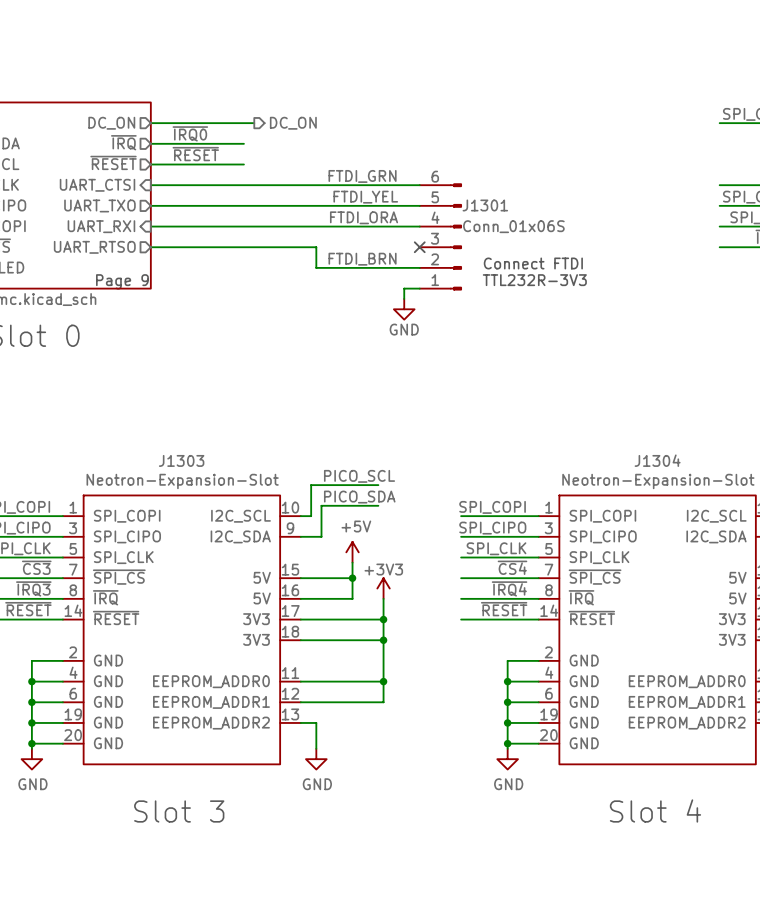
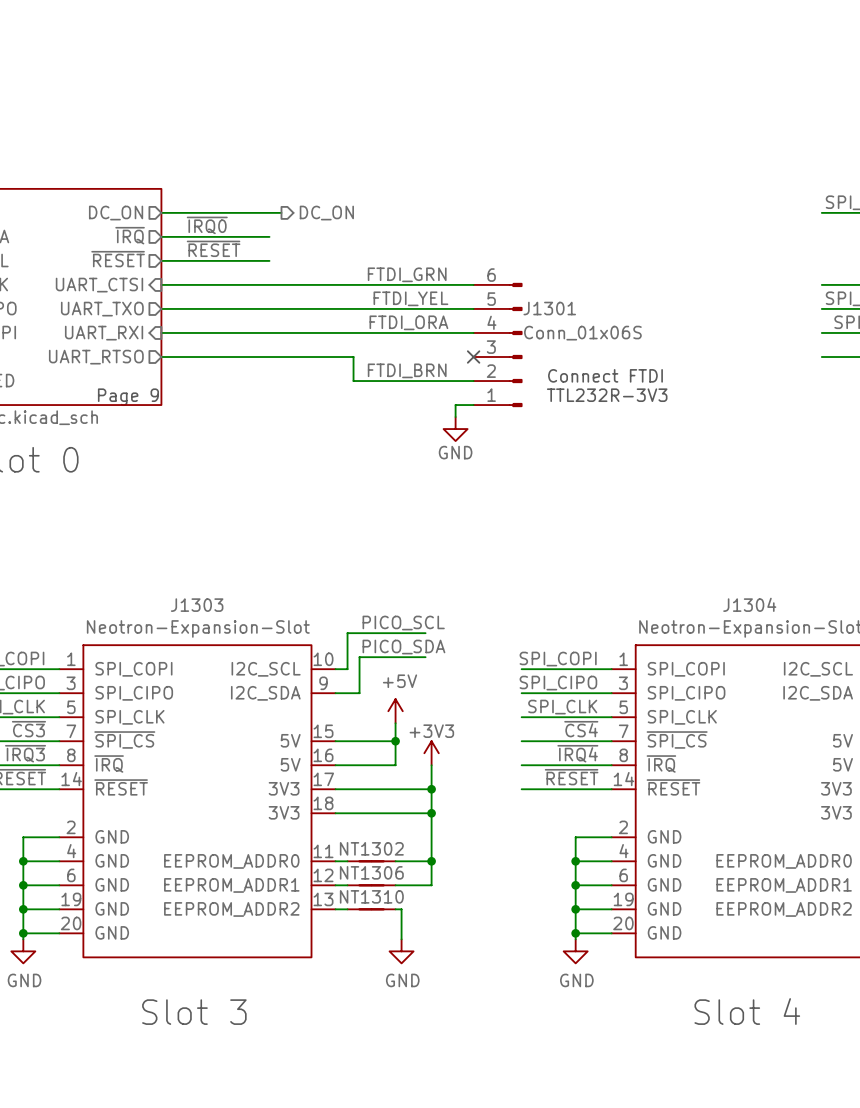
NT1302: none -> (371, 861)
NT1306: none -> (371, 885)
wire: (311, 722) (316, 722) (316, 748) -> (395, 909) (401, 909) (401, 939)
NT1310: none -> (371, 909)
power symbol position: GND (316, 759) -> GND (401, 951)

